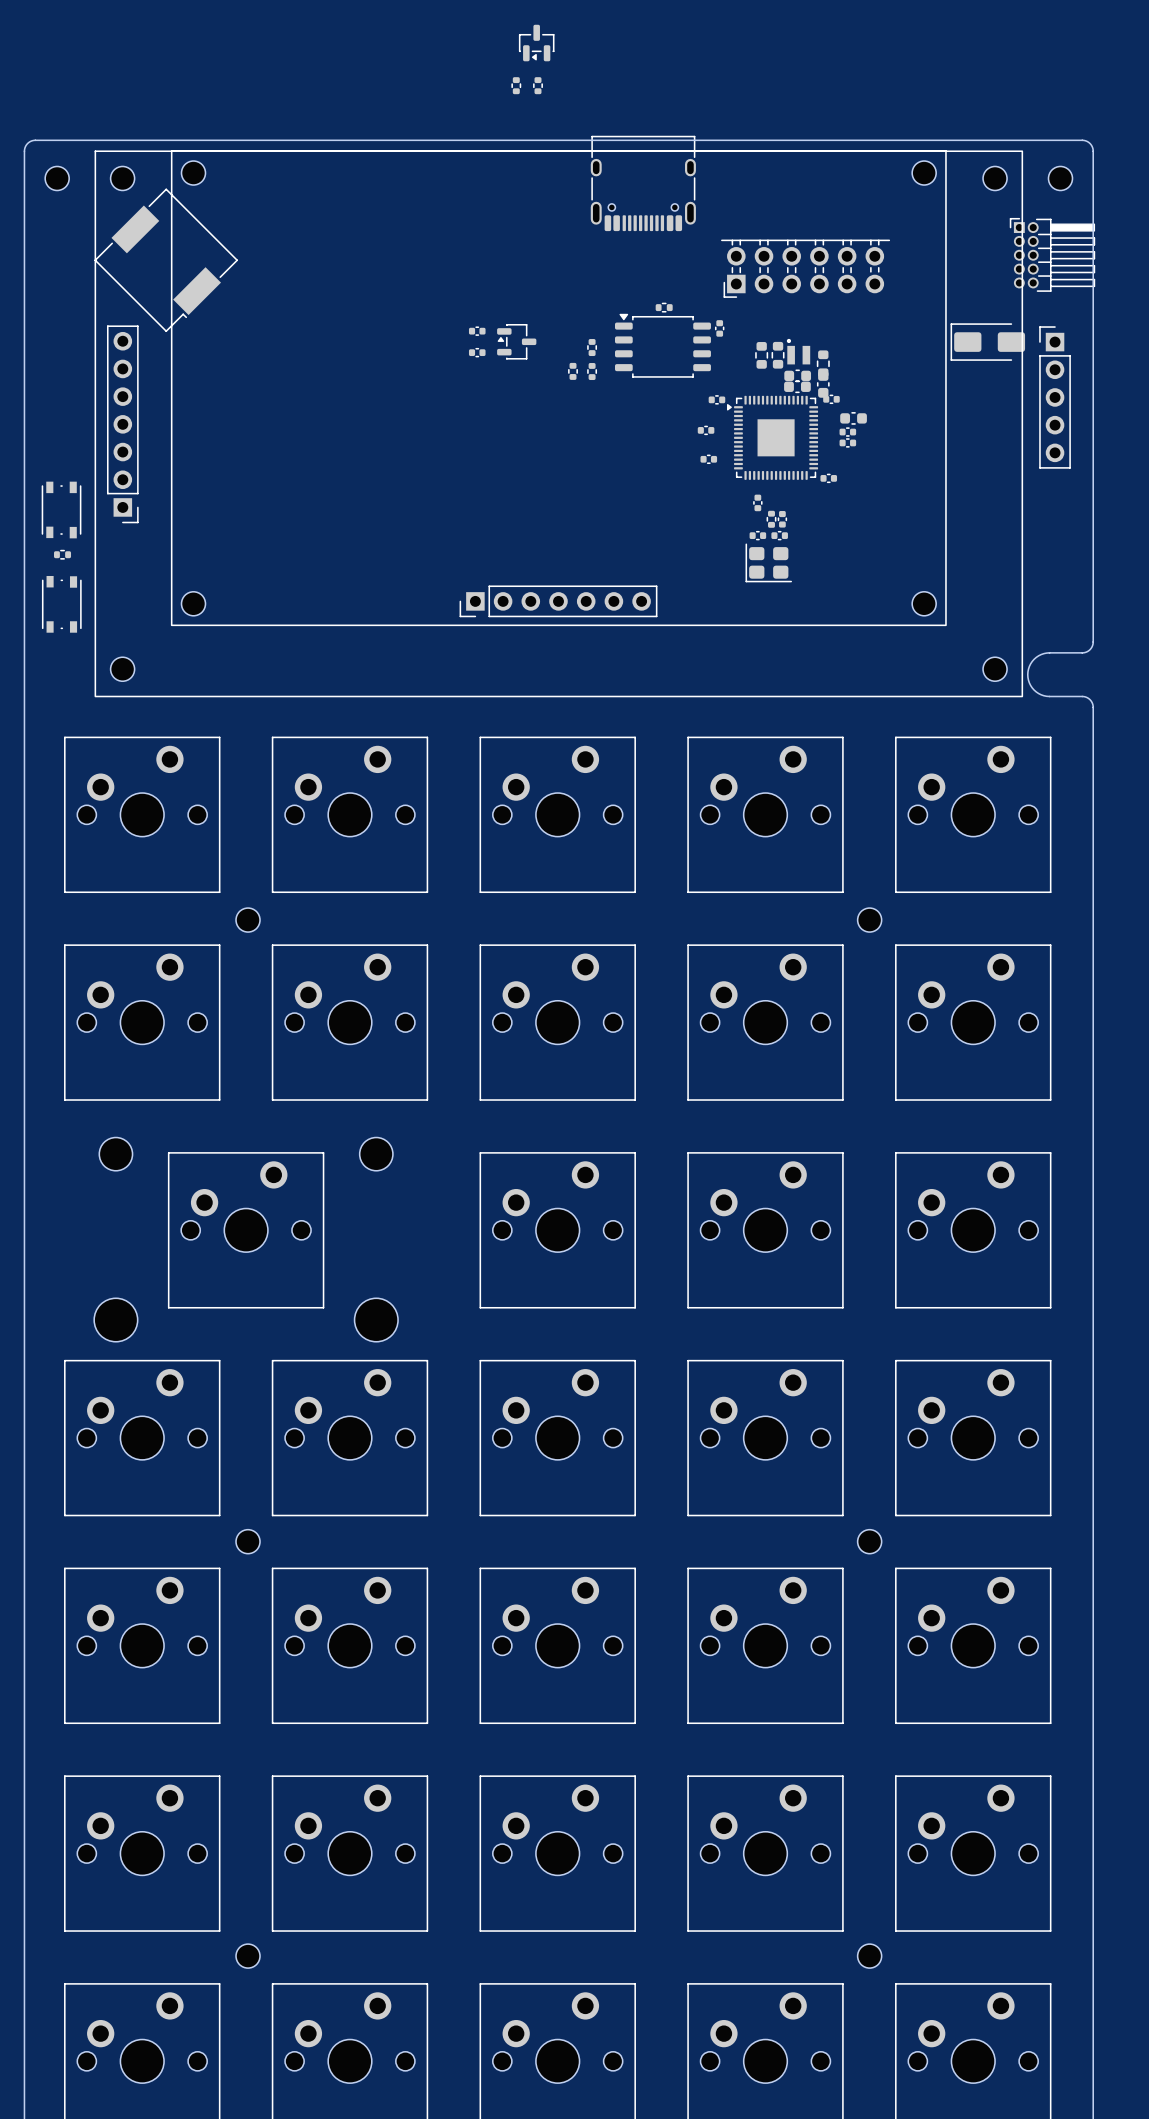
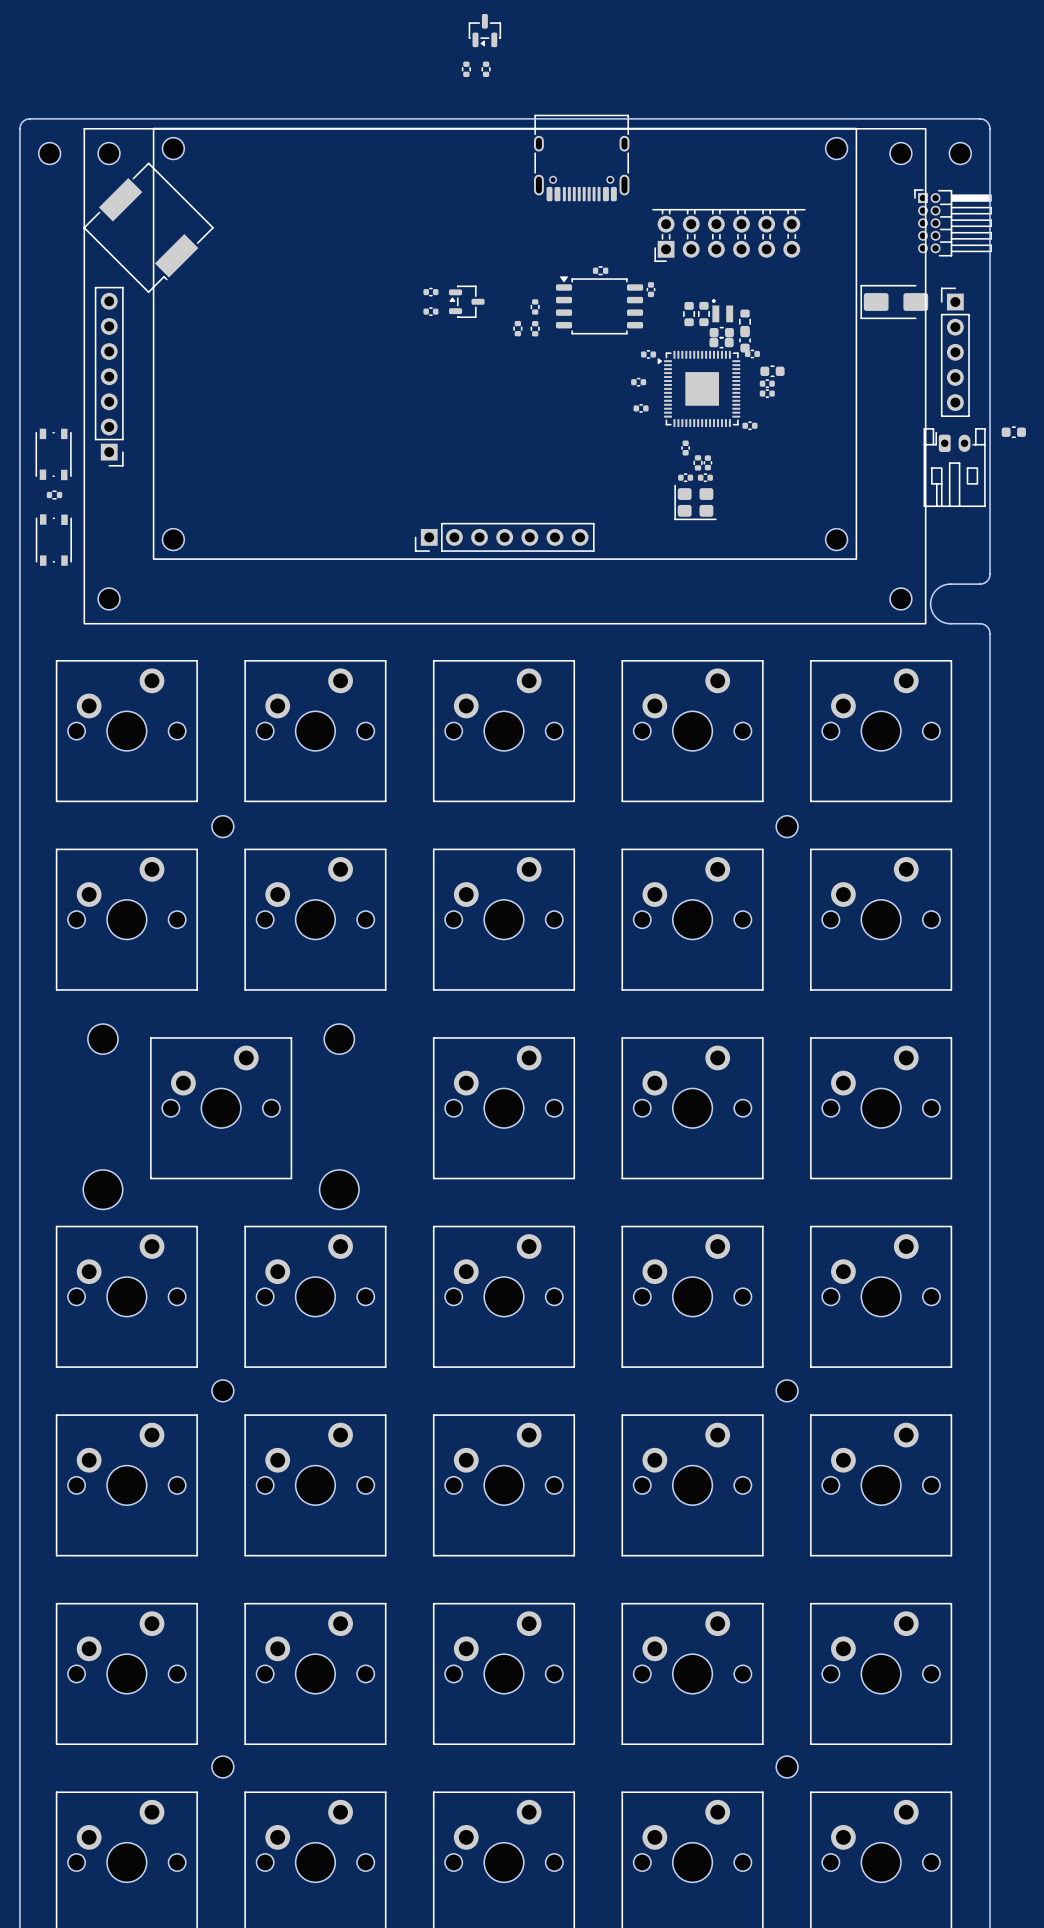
part: none -> (1013, 432)
part: none -> (954, 467)

